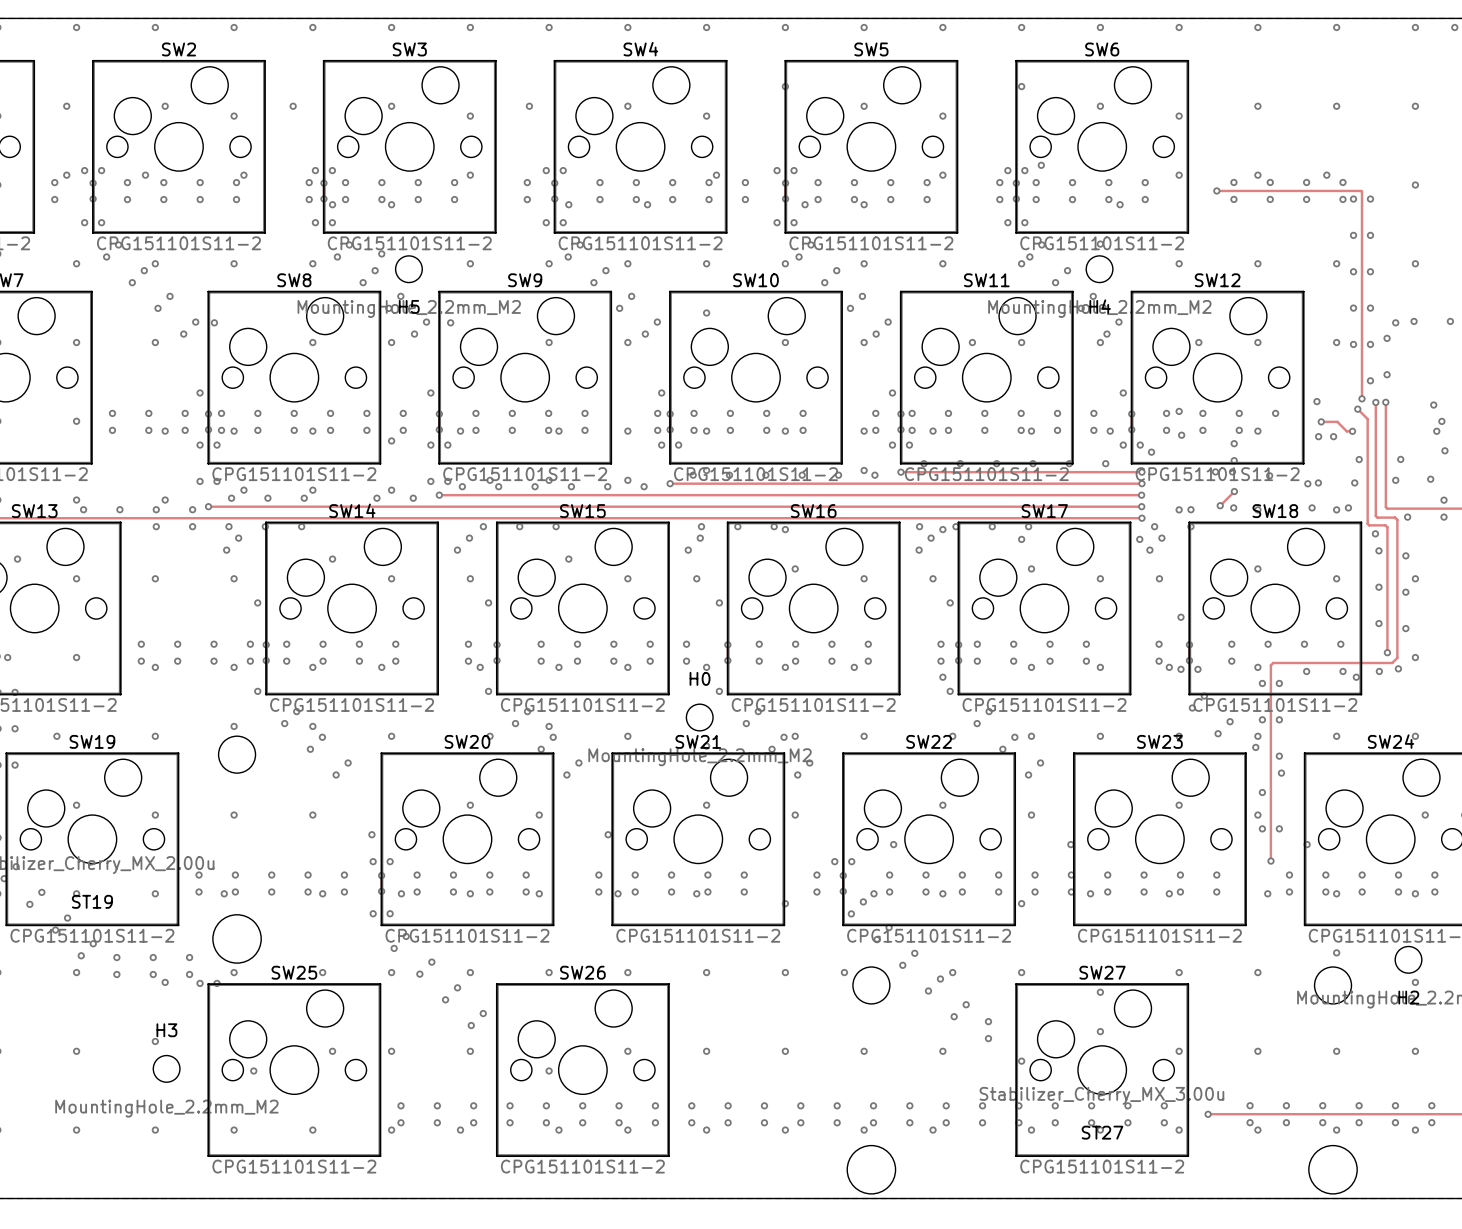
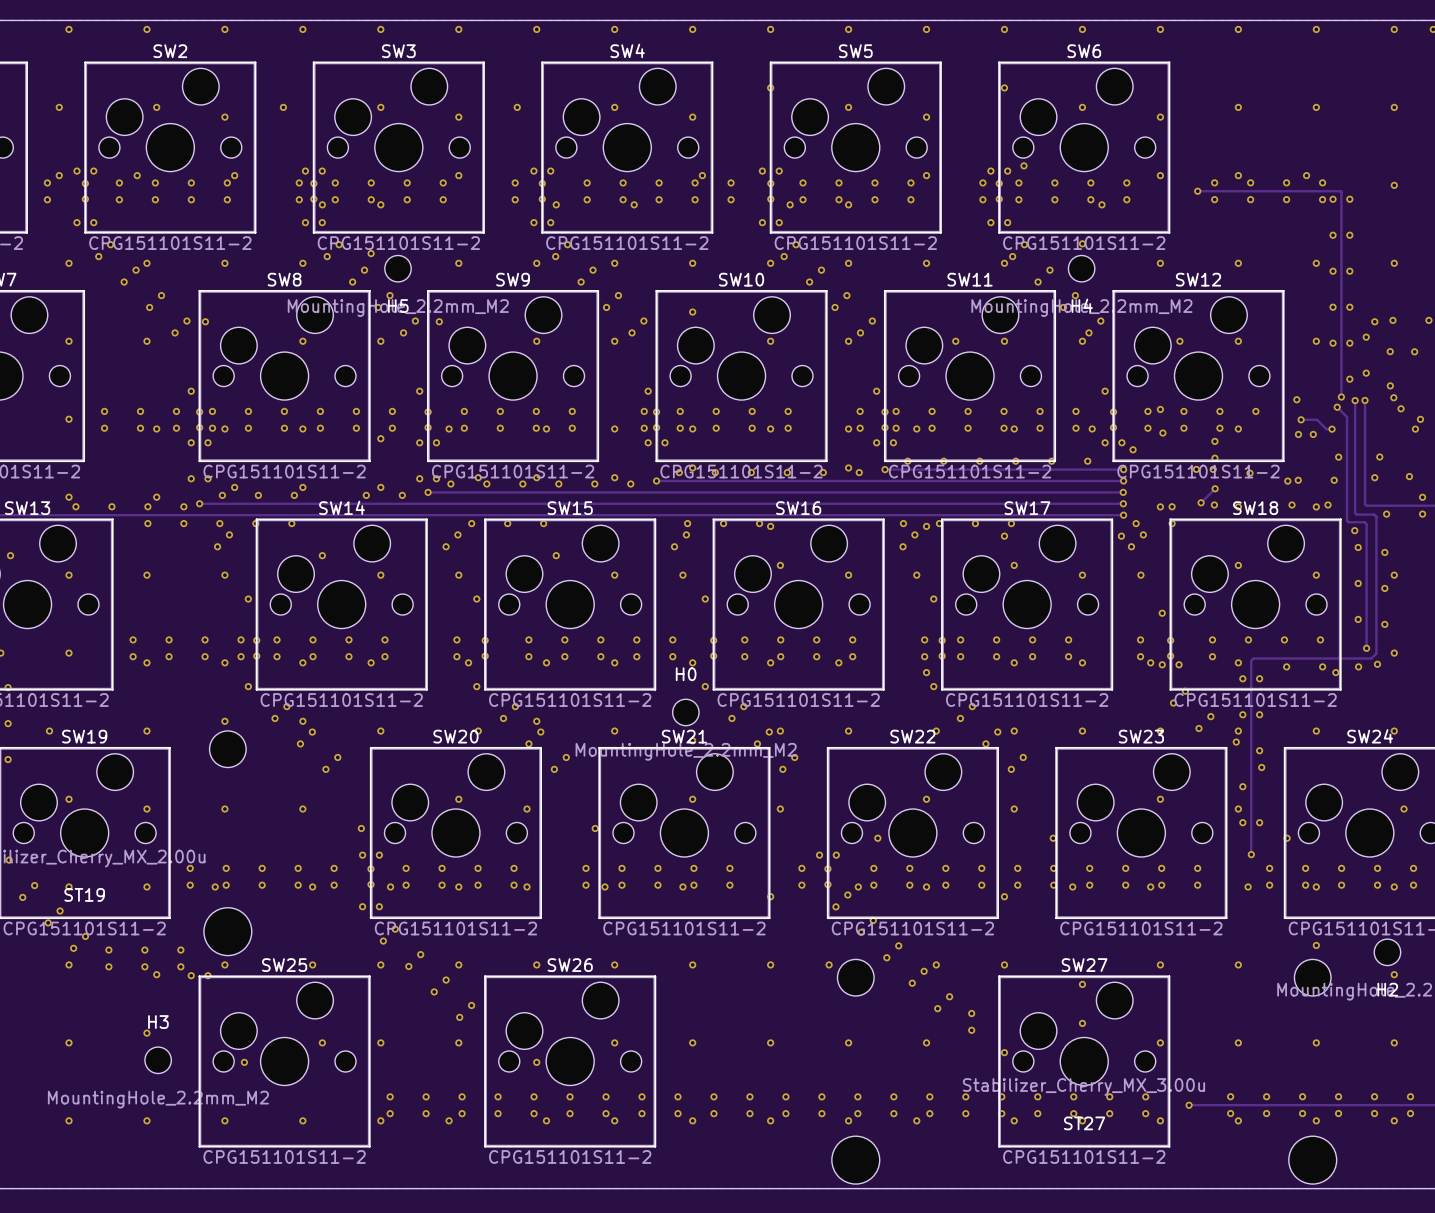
via: none -> (1390, 351)
via: none -> (1414, 351)
via: none -> (1390, 385)
via: none -> (1393, 397)
via: (1433, 405) -> none
via: none -> (1401, 408)
via: (1444, 450) -> none

